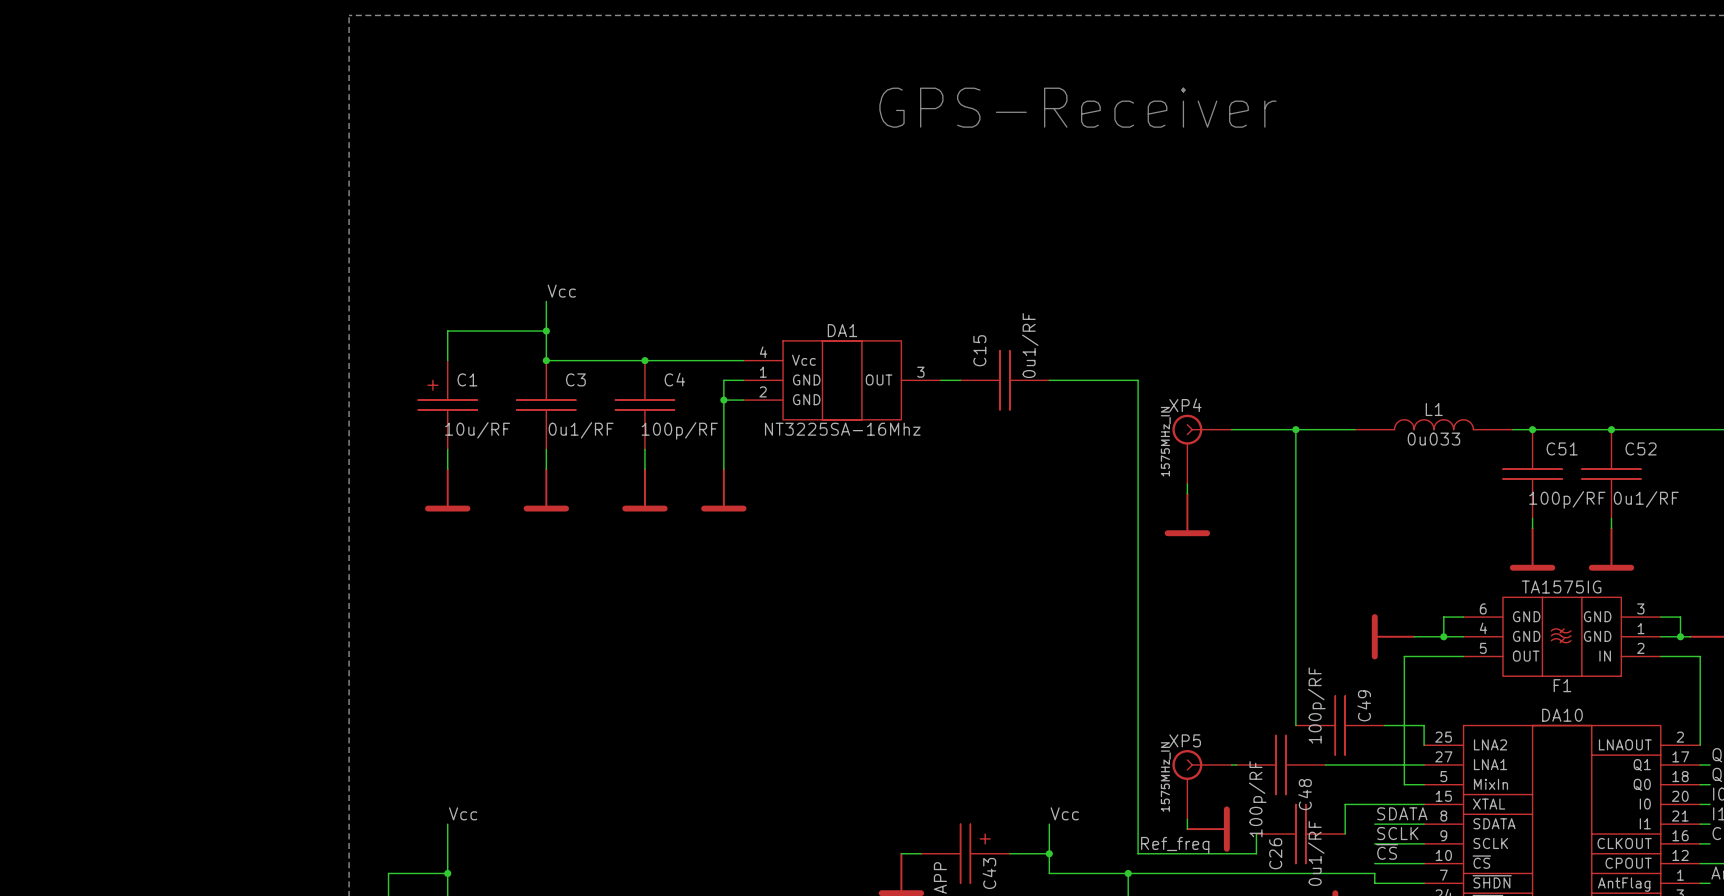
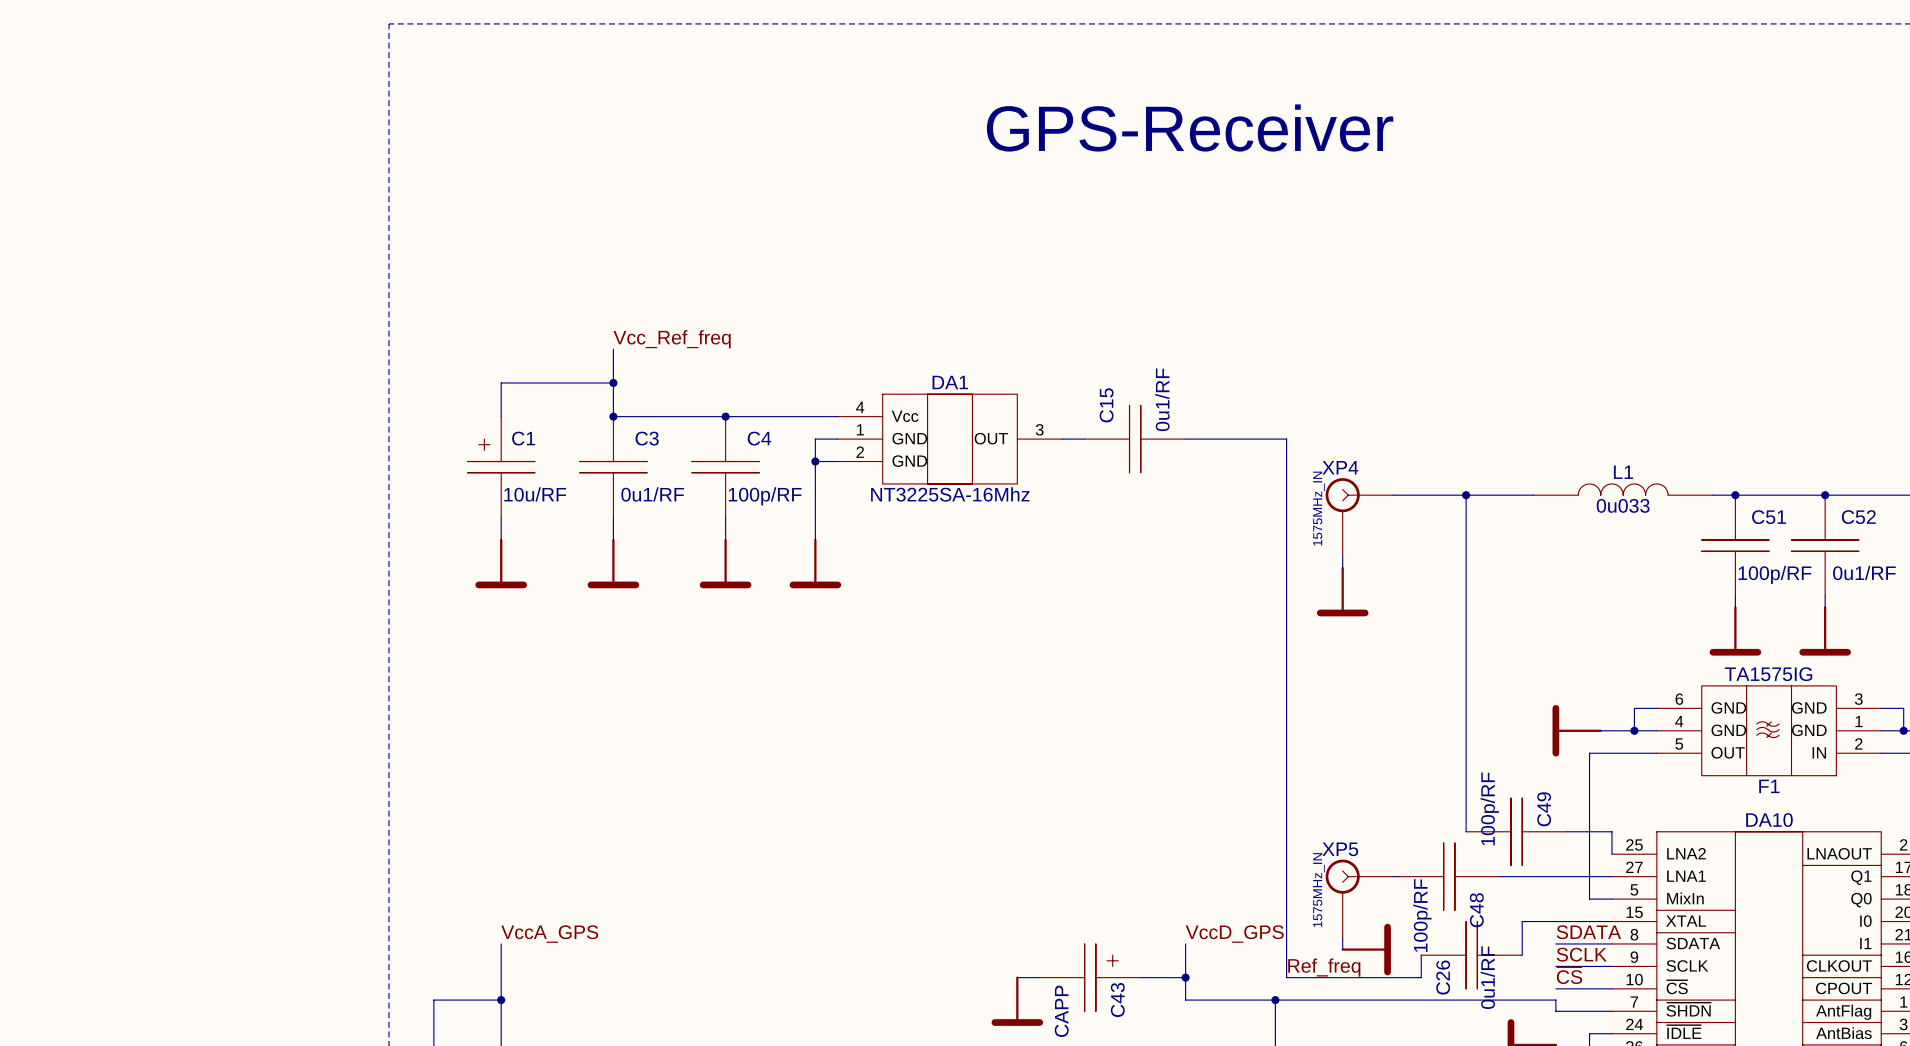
label: Vcc (561, 291) -> Vcc_Ref_freq (672, 339)
label: Vcc (463, 813) -> VccA_GPS (549, 934)
label: Vcc (1064, 813) -> VccD_GPS (1234, 934)

